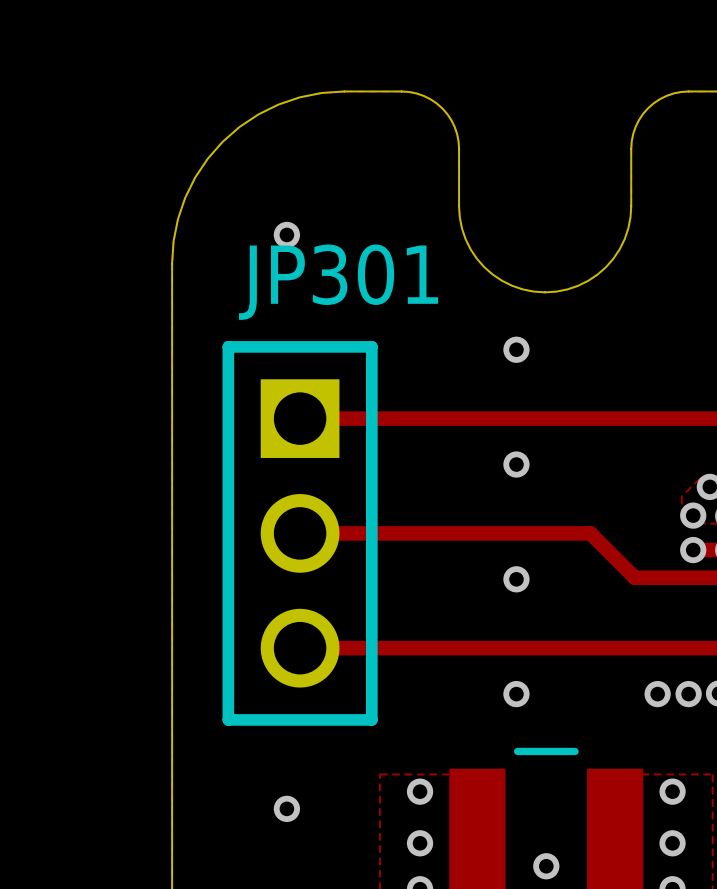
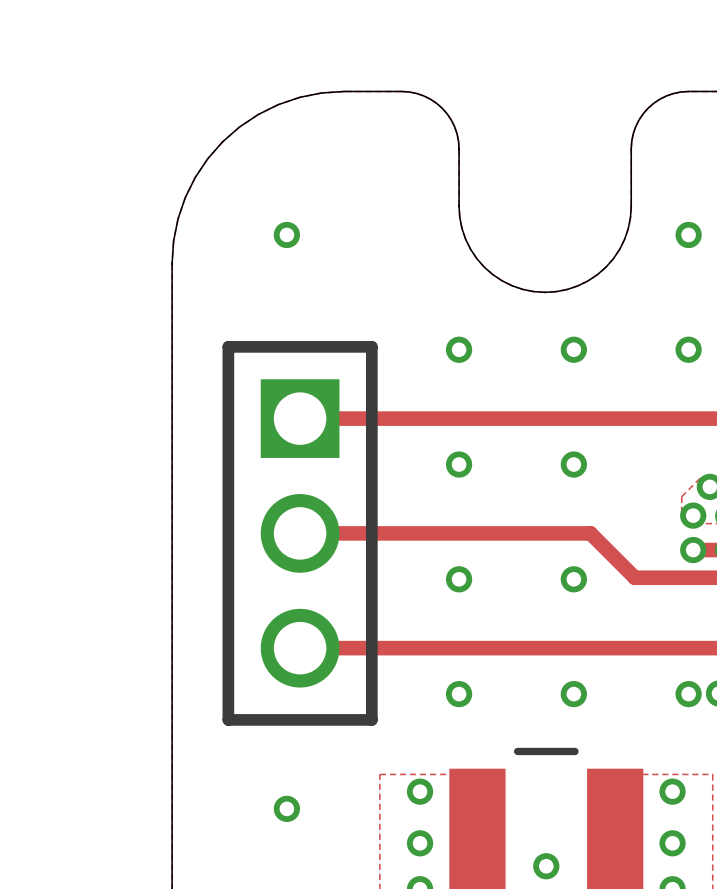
via: none -> (688, 234)
JP301 name: JP301 (338, 282) -> none
via: none -> (459, 349)
via: (516, 349) -> none
via: none -> (573, 349)
via: none -> (688, 349)
via: none -> (459, 464)
via: (516, 464) -> none
via: none -> (573, 464)
via: none -> (459, 579)
via: (516, 579) -> none
via: none -> (573, 579)
via: none -> (459, 694)
via: (516, 694) -> none
via: none -> (573, 694)
via: (657, 694) -> none

